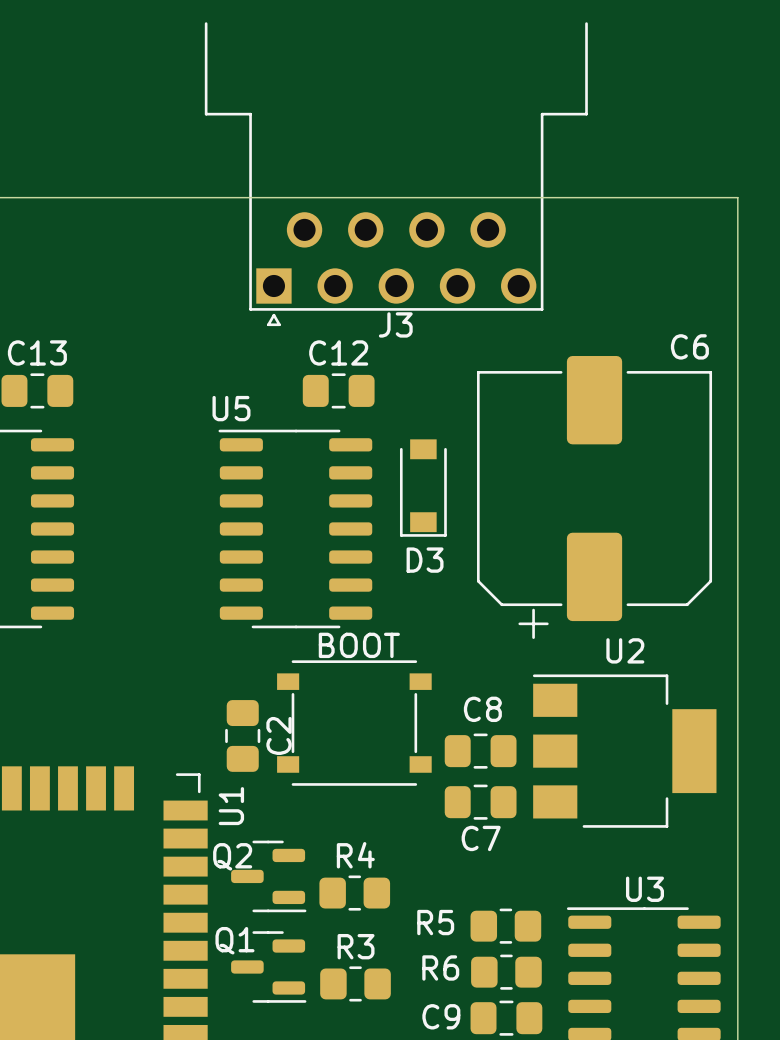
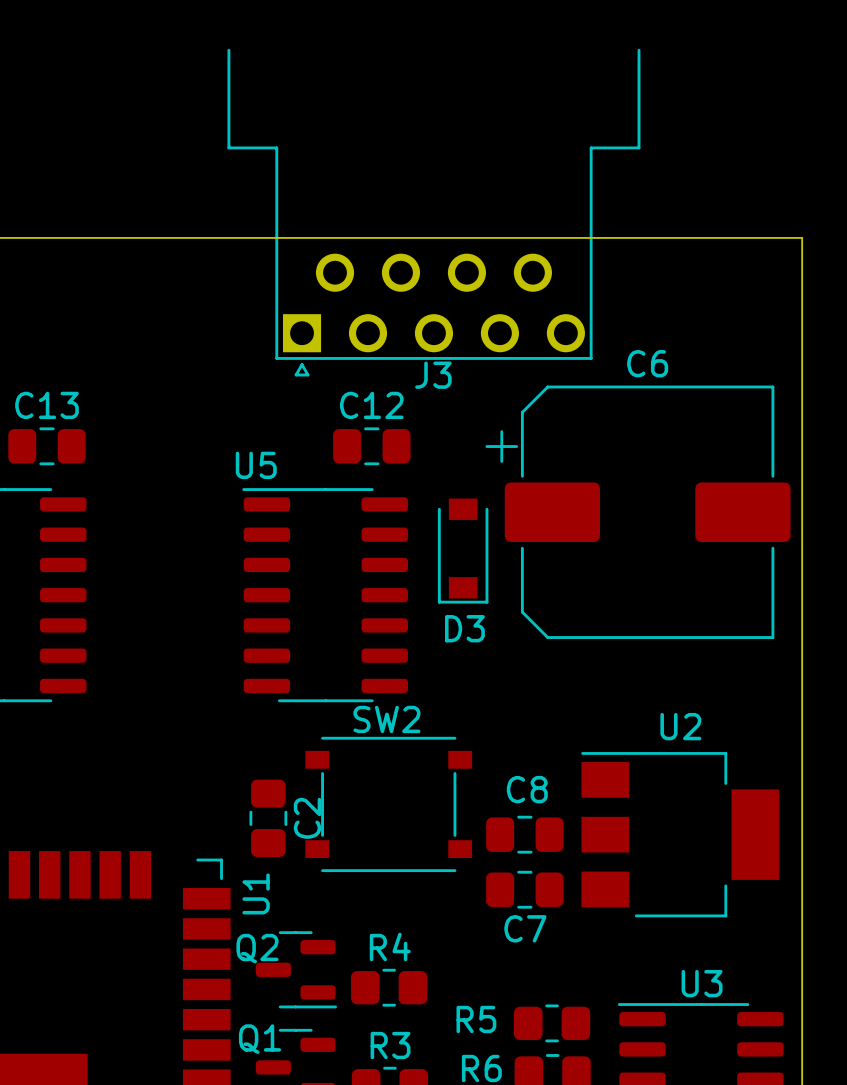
C6 name position: C6 (689, 346) -> C6 (647, 363)
C6 rotation: 0° (594, 497) -> 90° clockwise (638, 512)
SW2 name: none -> SW2 (386, 719)
SW2 value: BOOT (359, 645) -> none

